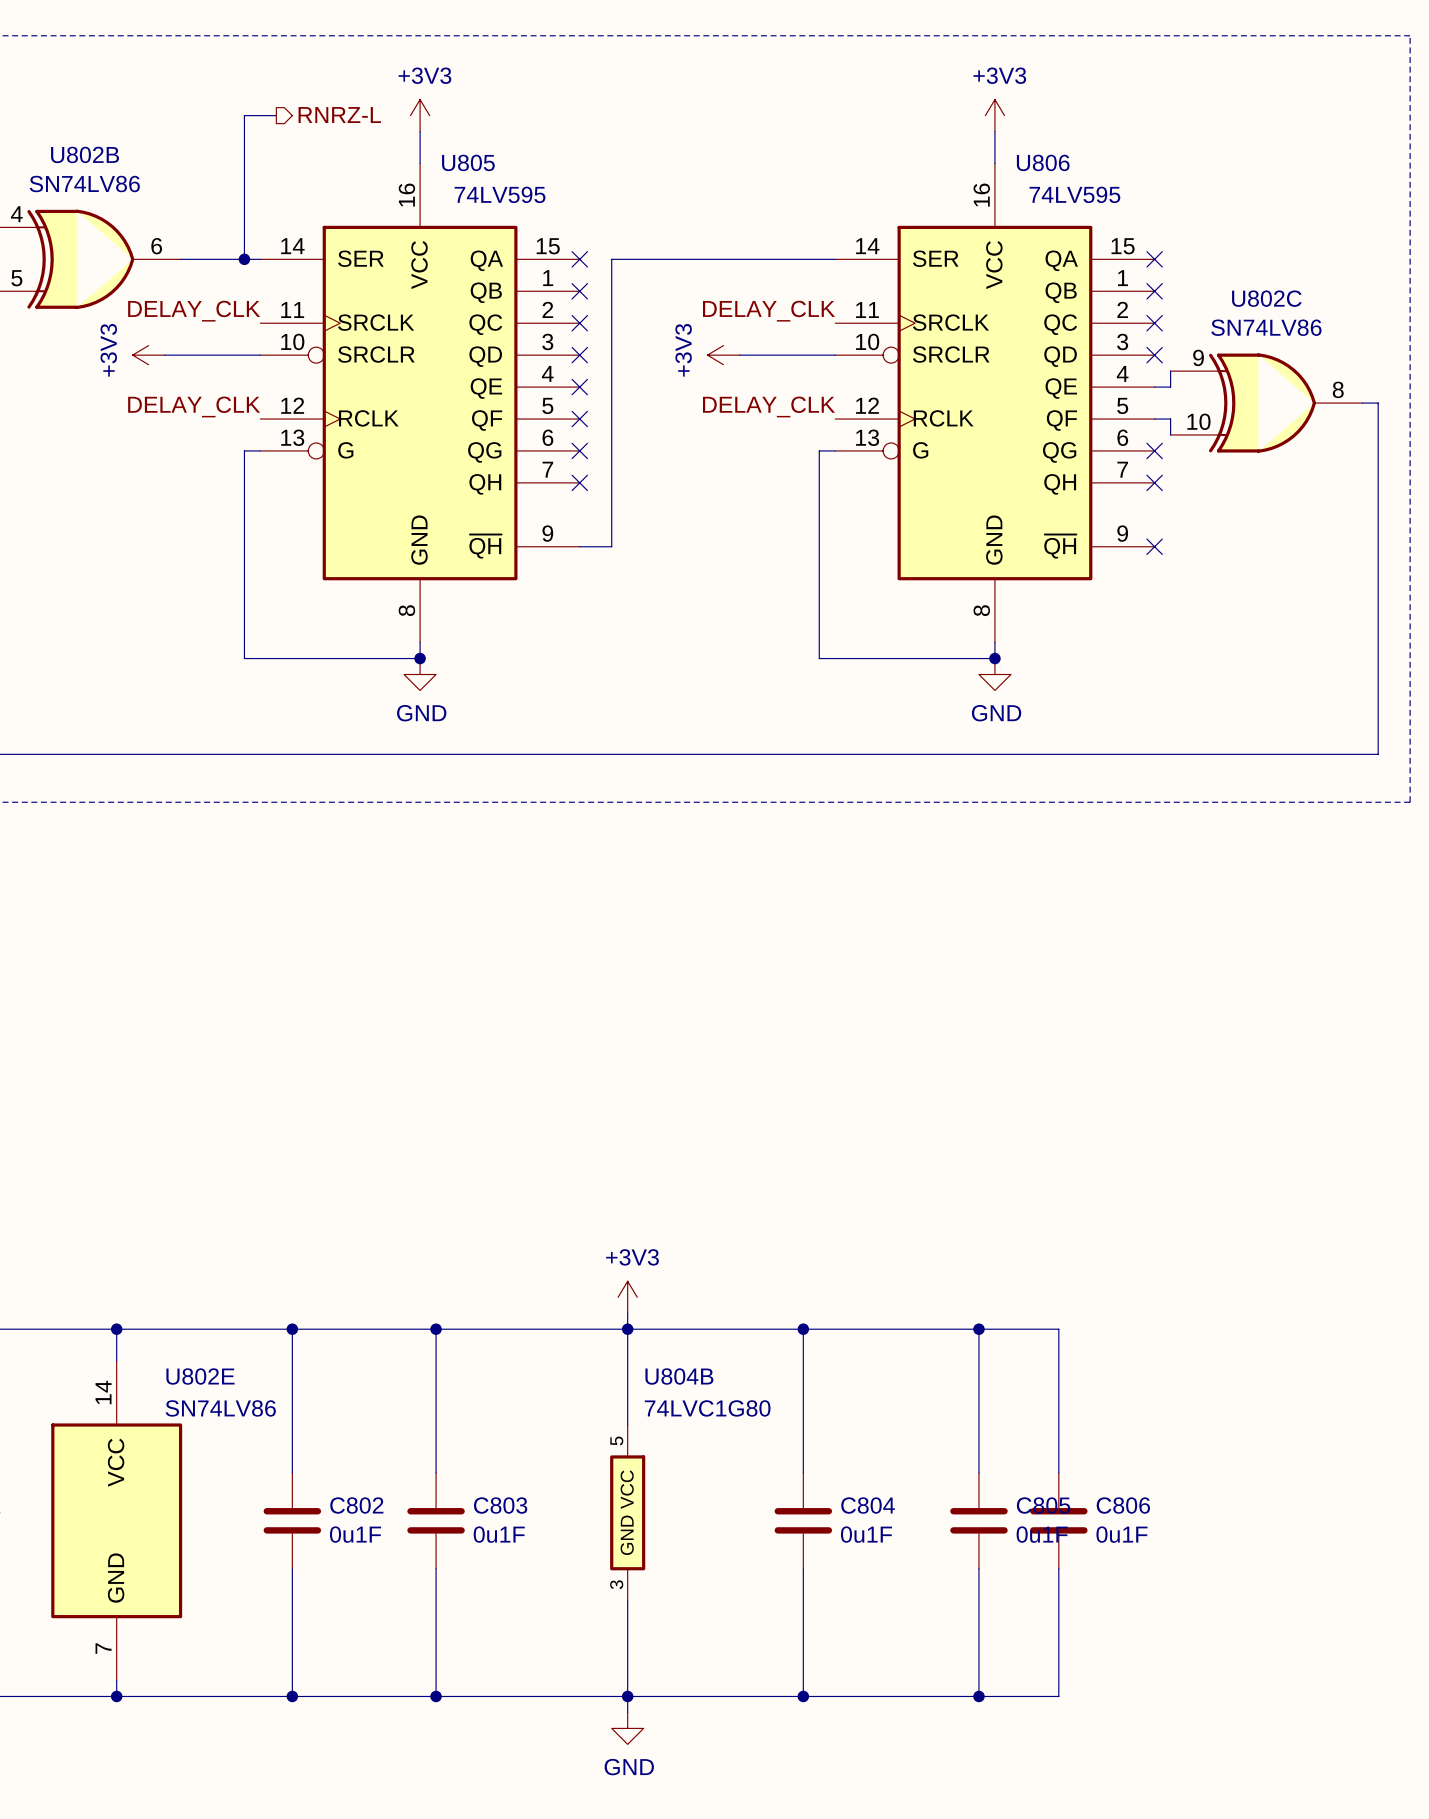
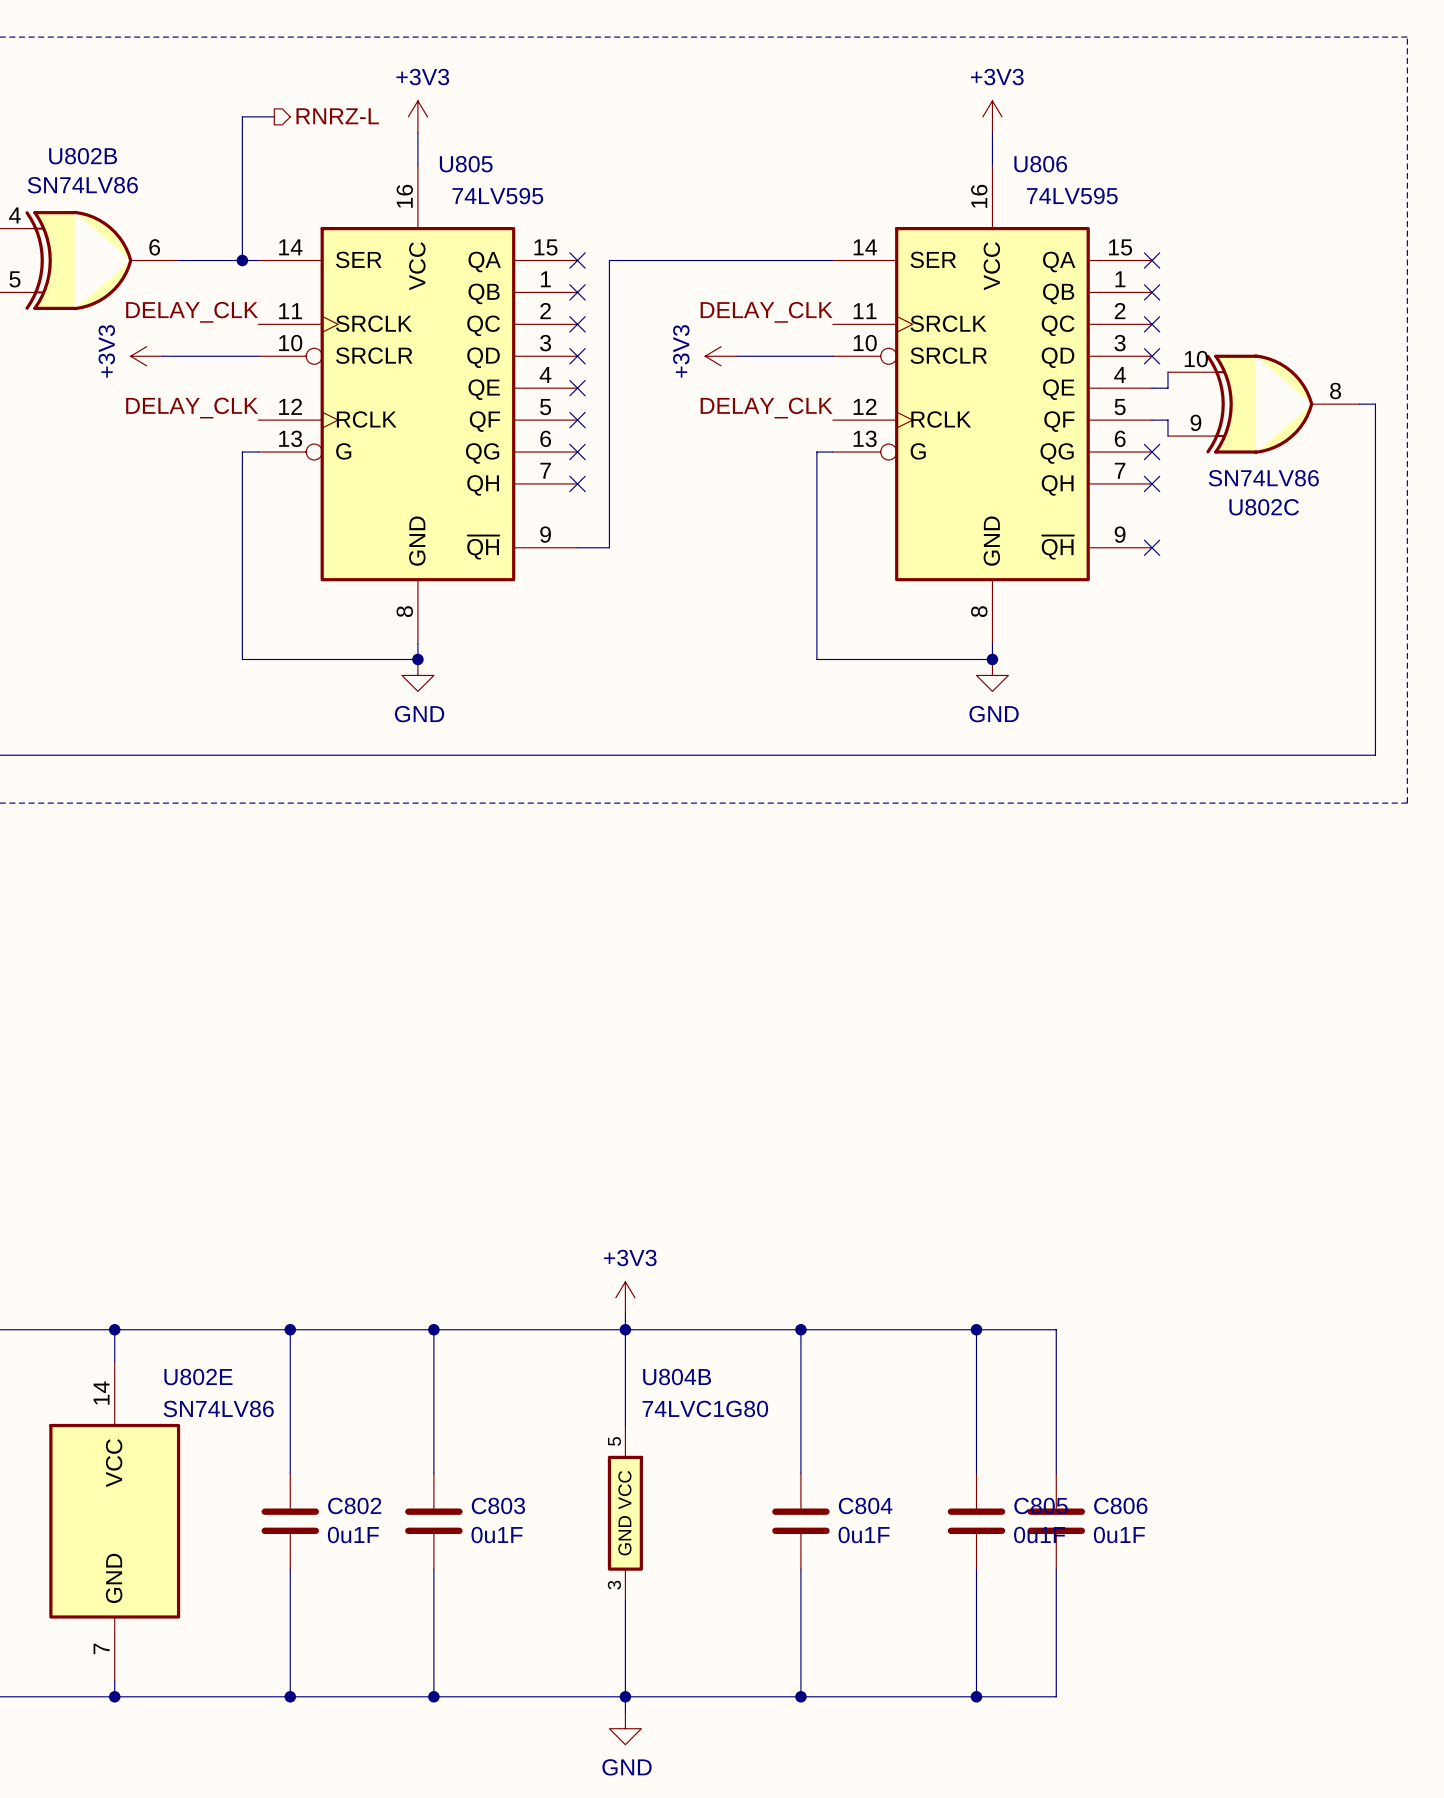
U802C flip: as is (1262, 403) -> up-down (1259, 404)

